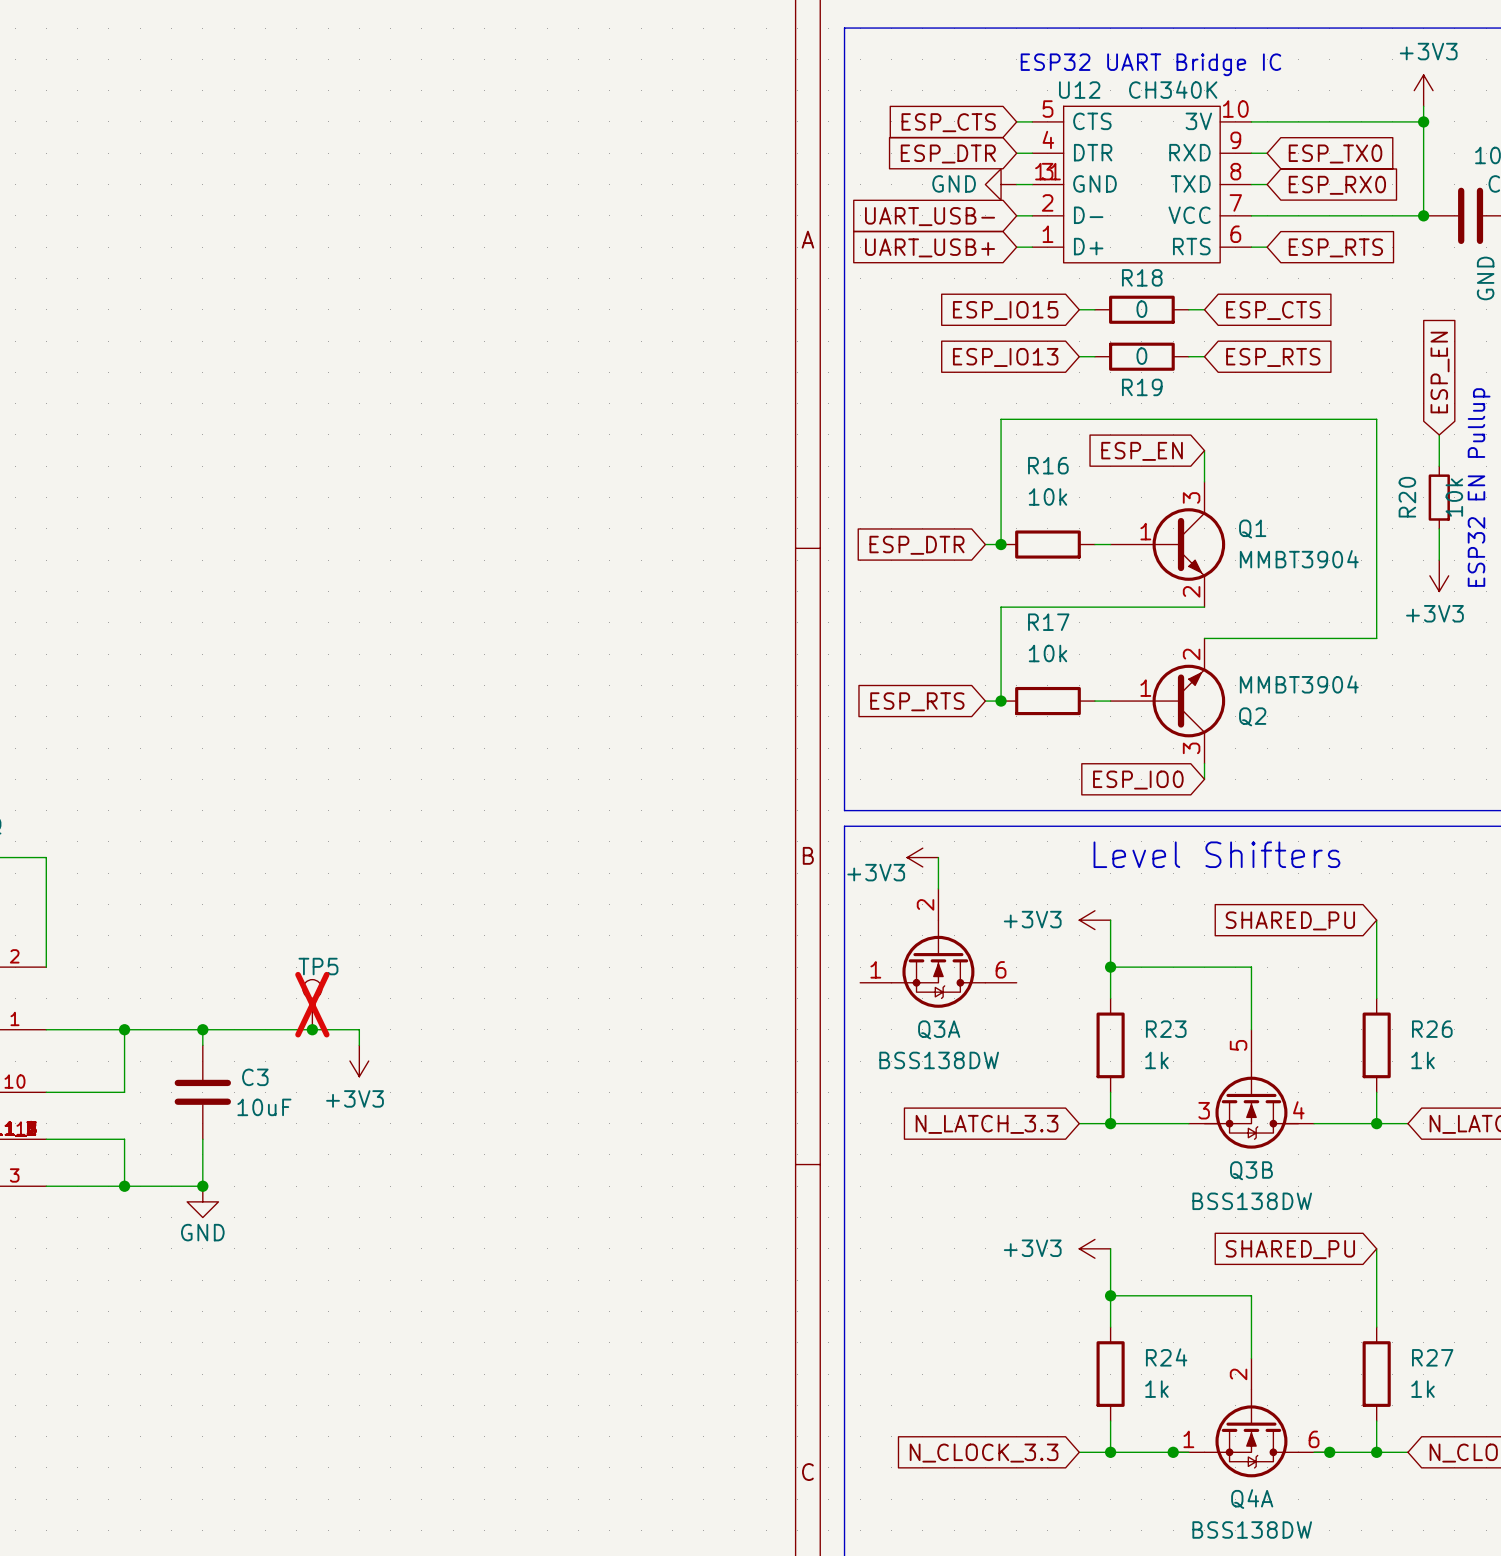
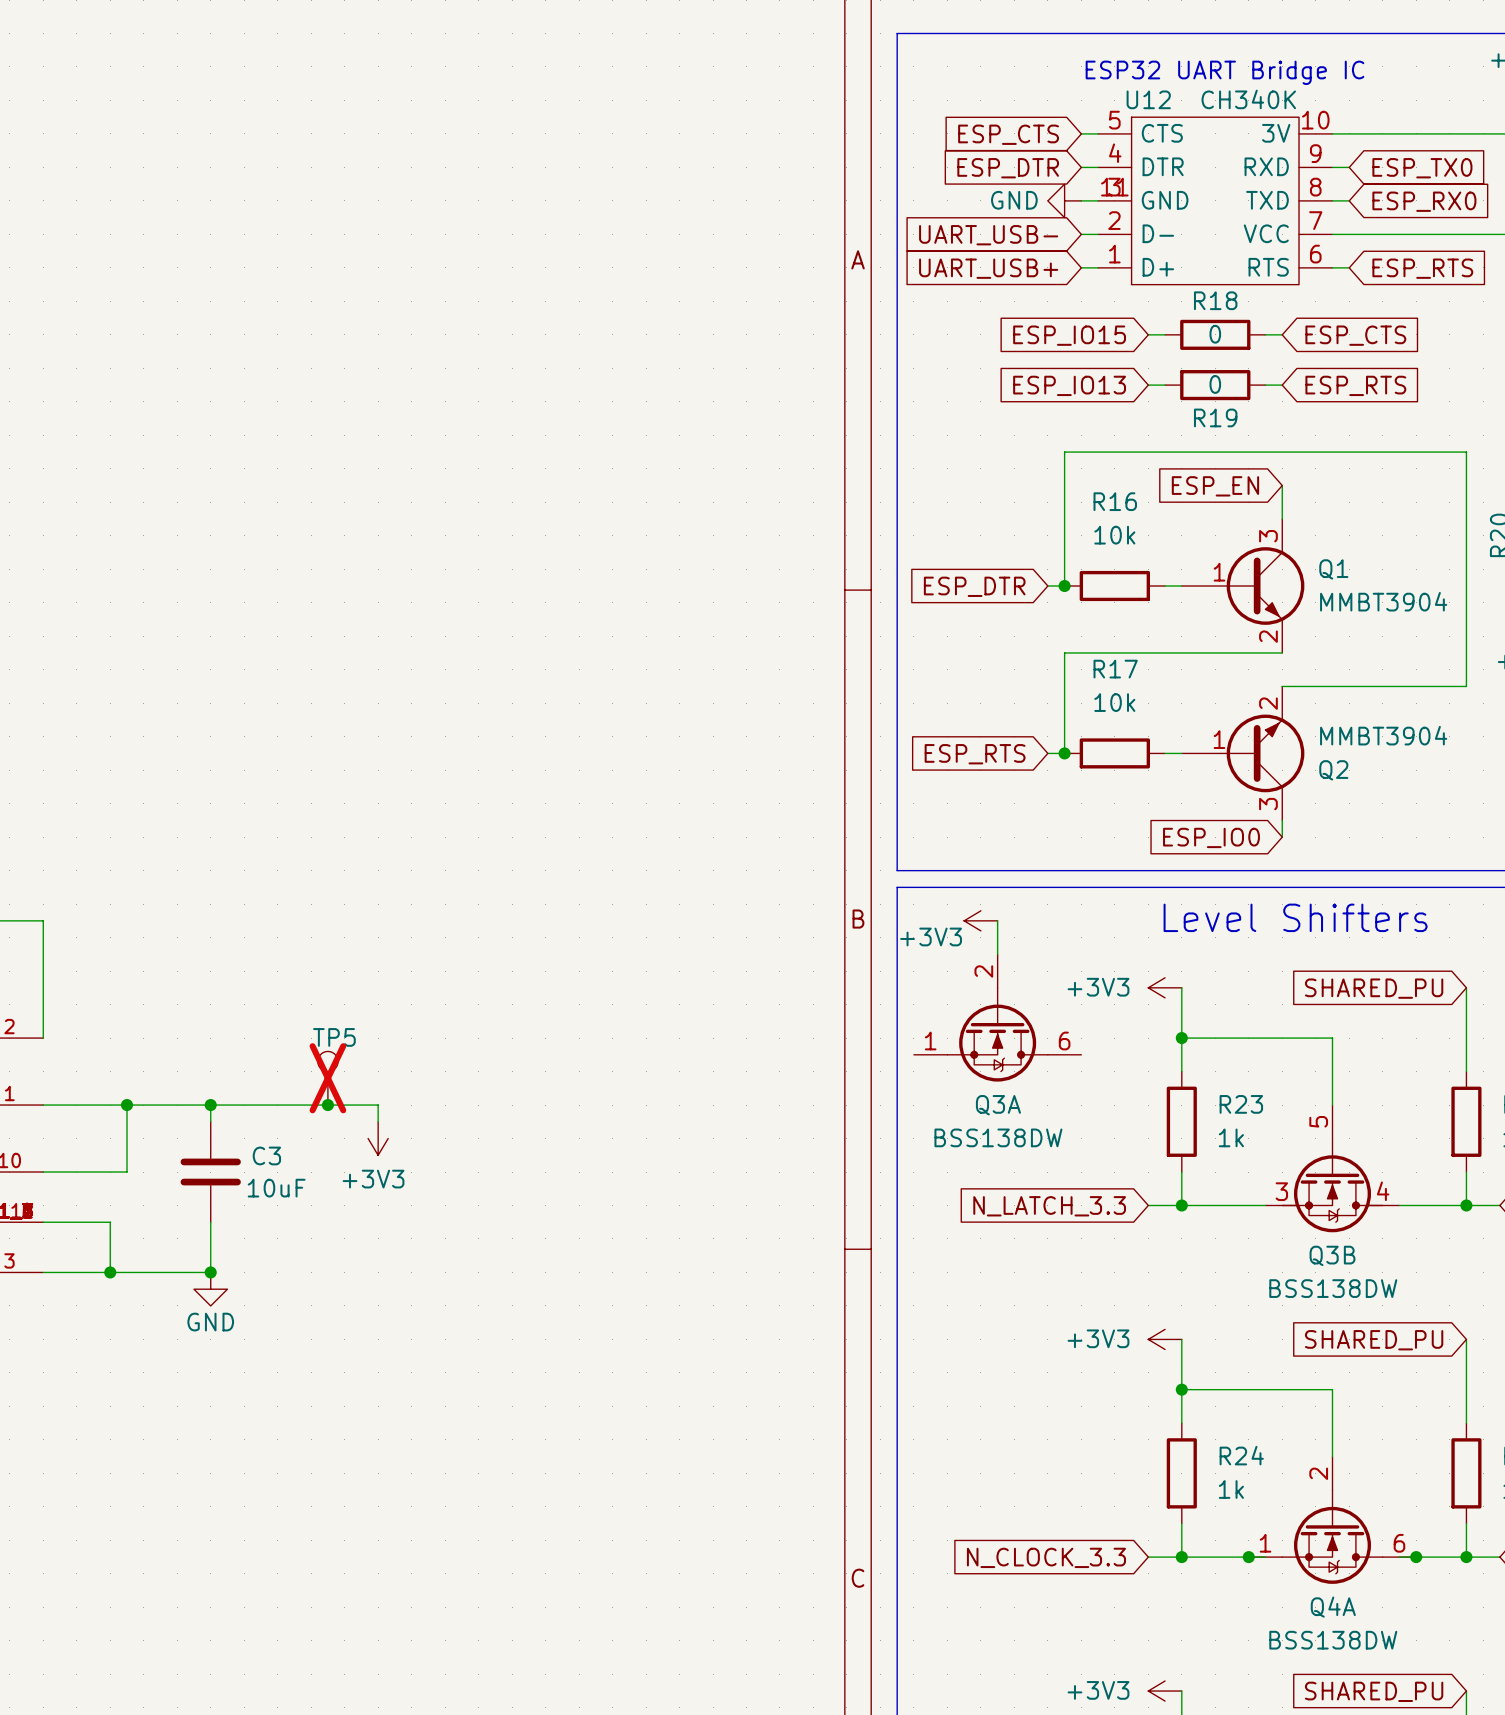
wire: (108, 1139) (124, 1139) (124, 1186) -> (110, 1222) (110, 1272)
junction position: (124, 1186) -> (110, 1272)

